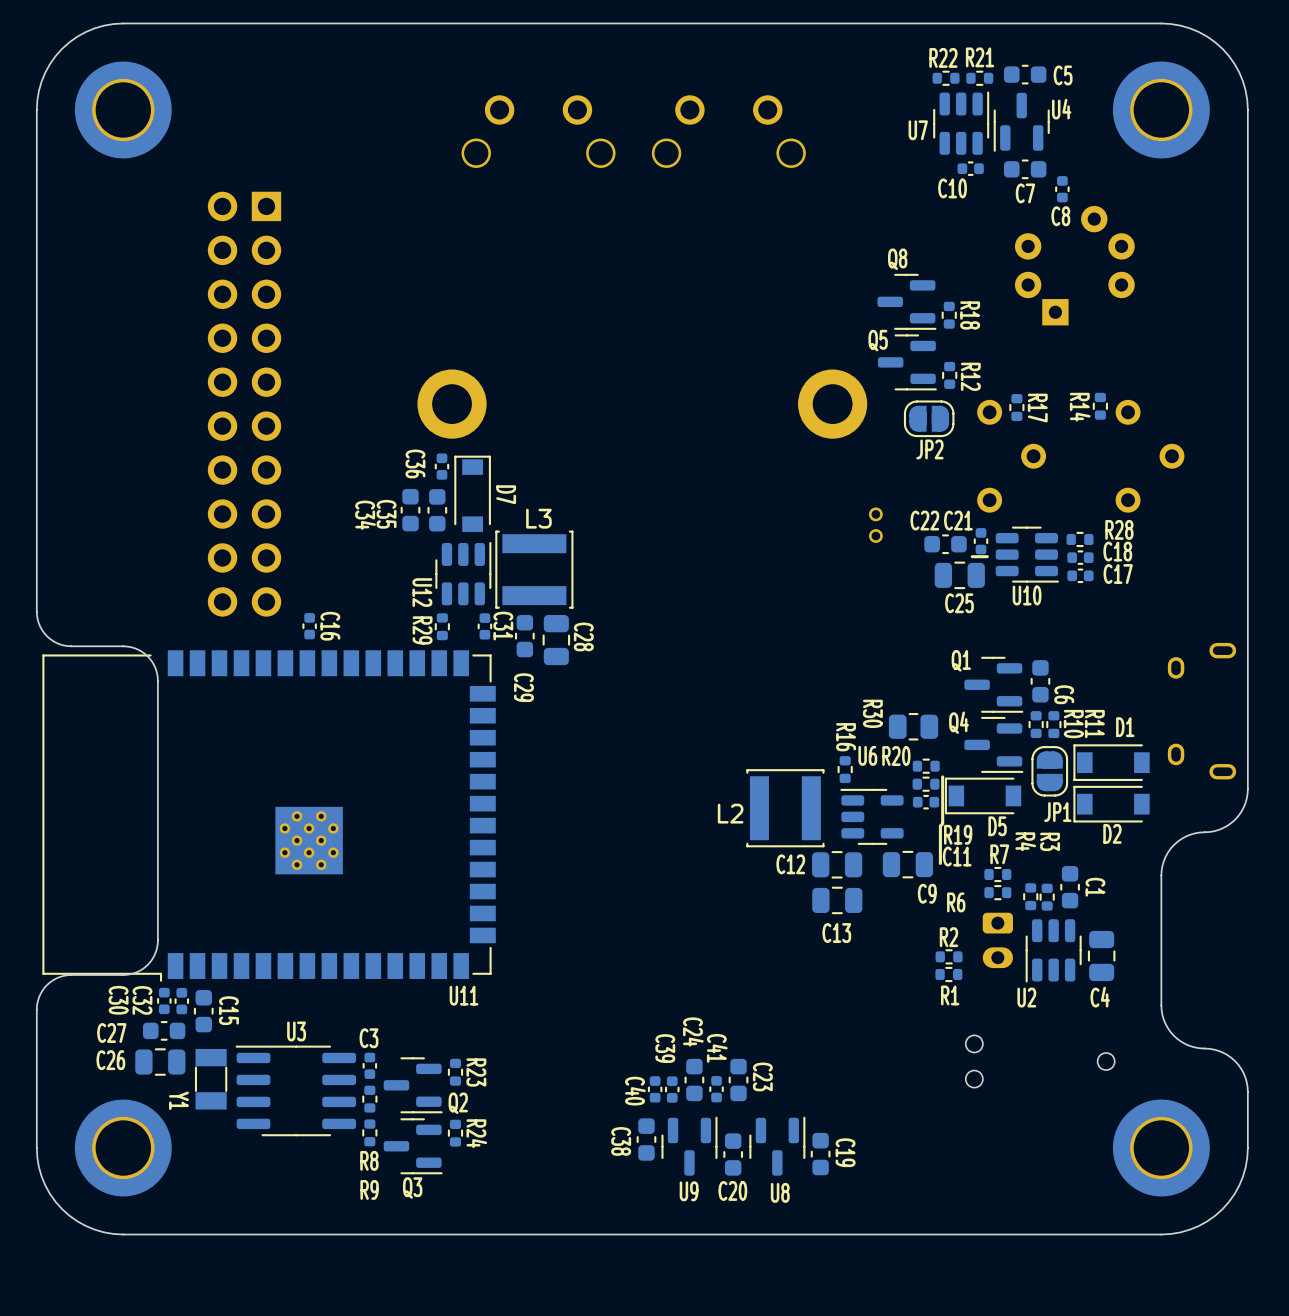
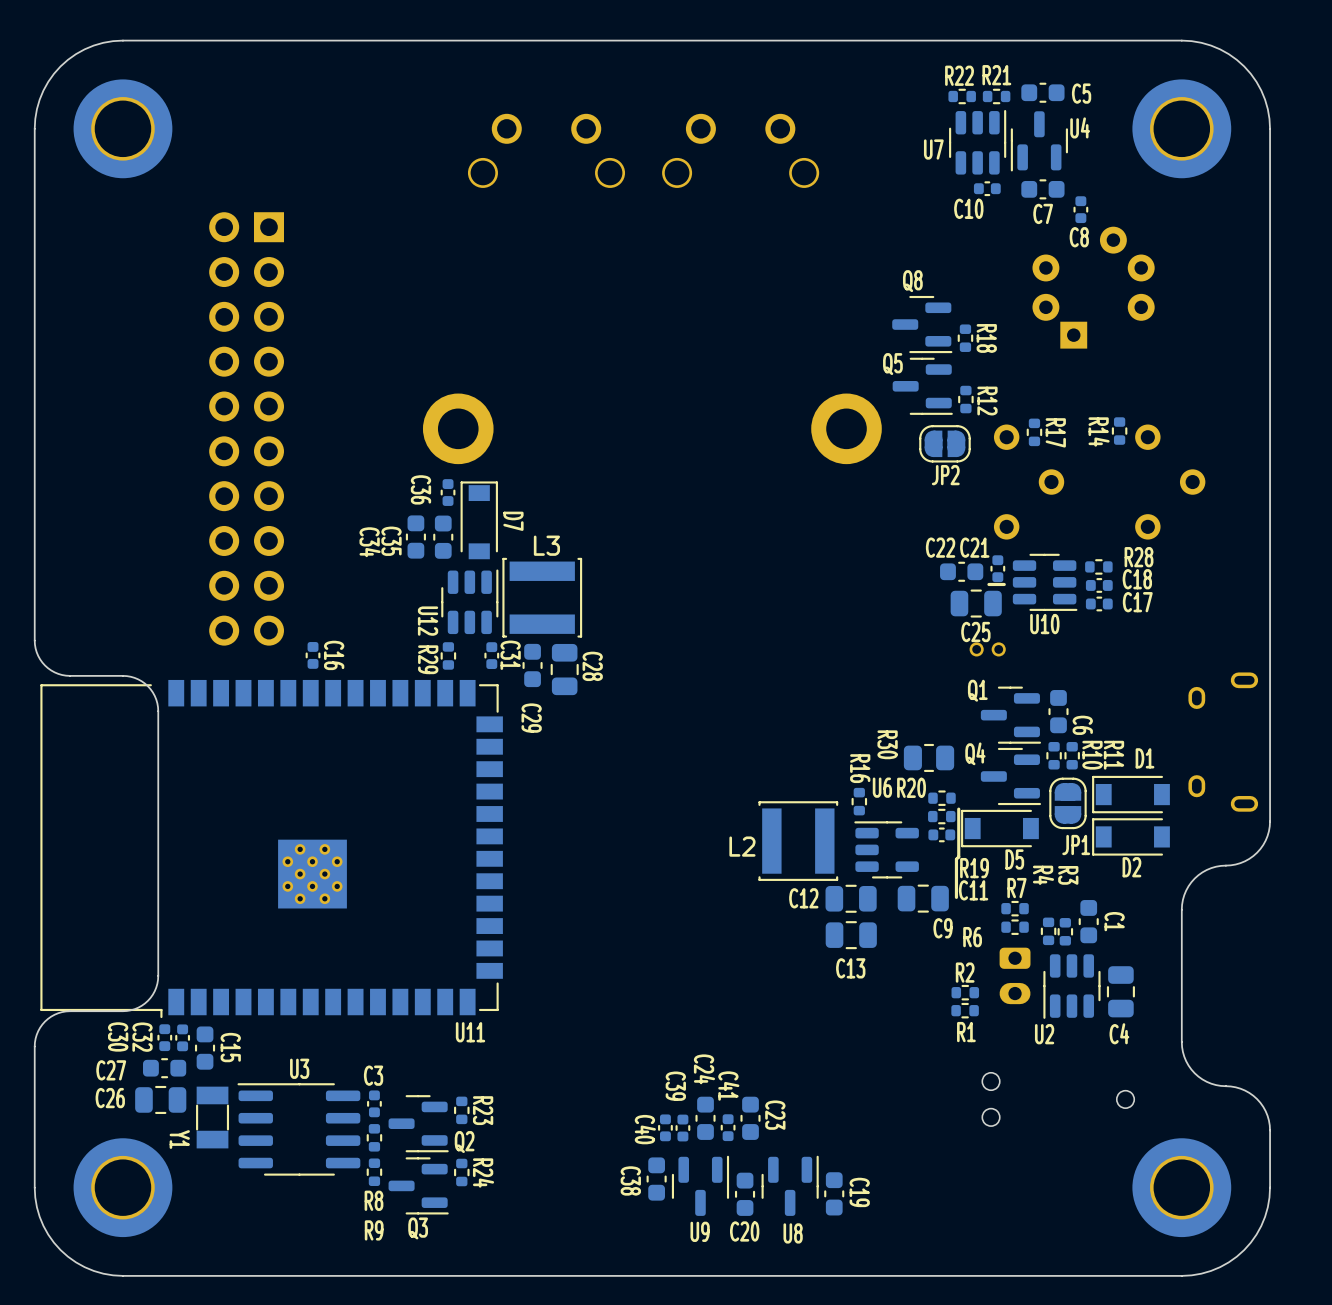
part rotation: 0° (875, 525) -> 90° clockwise (987, 649)
part position: (875, 525) -> (987, 649)

